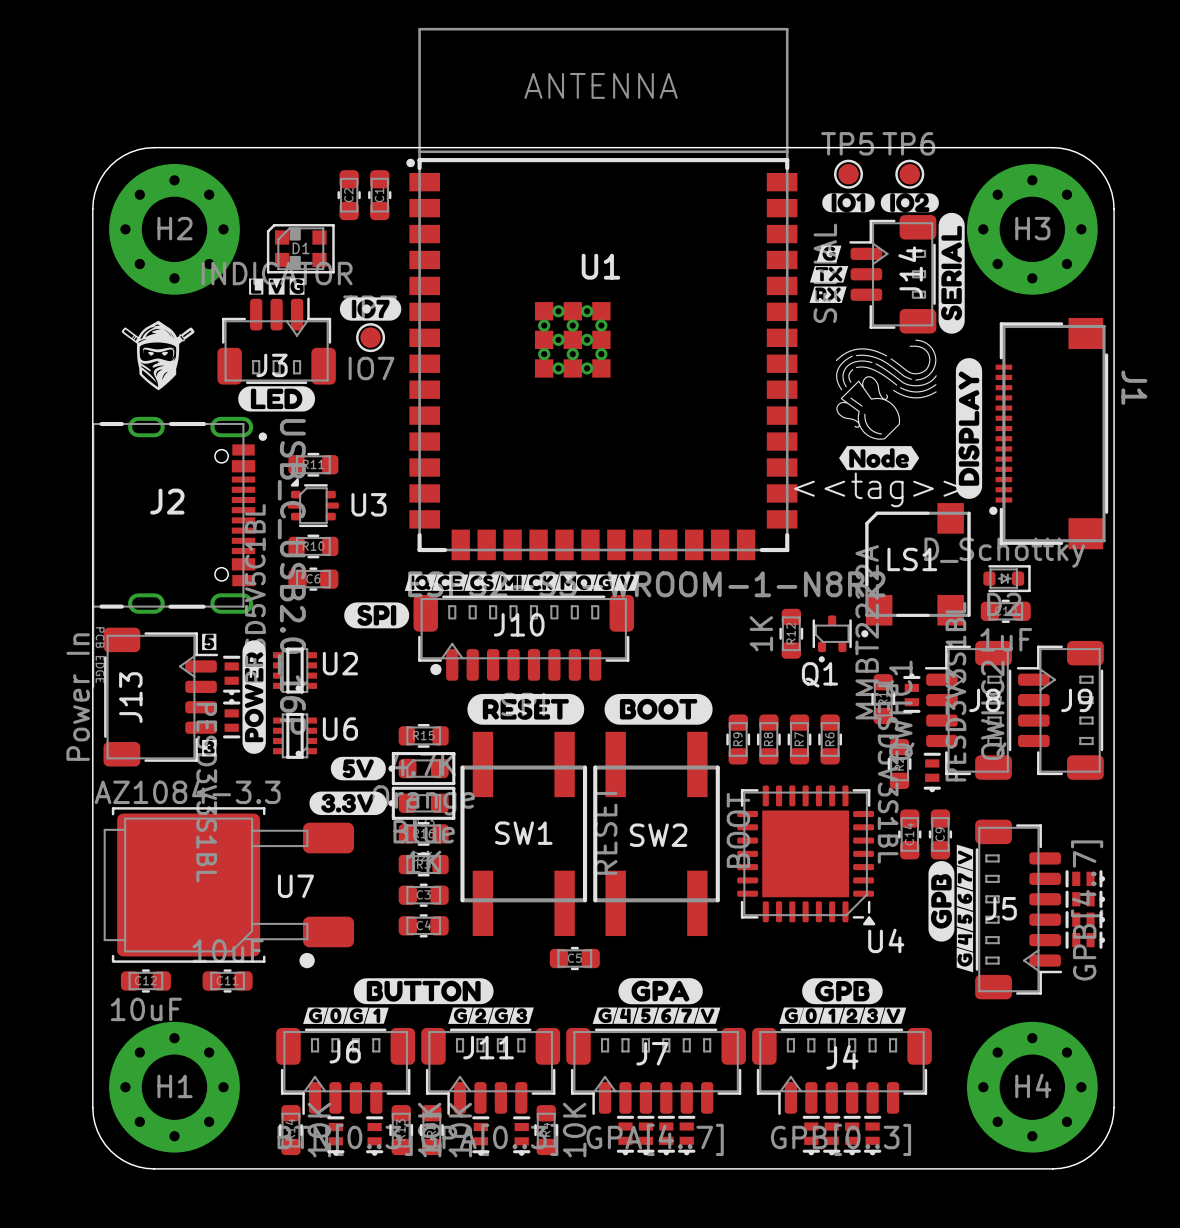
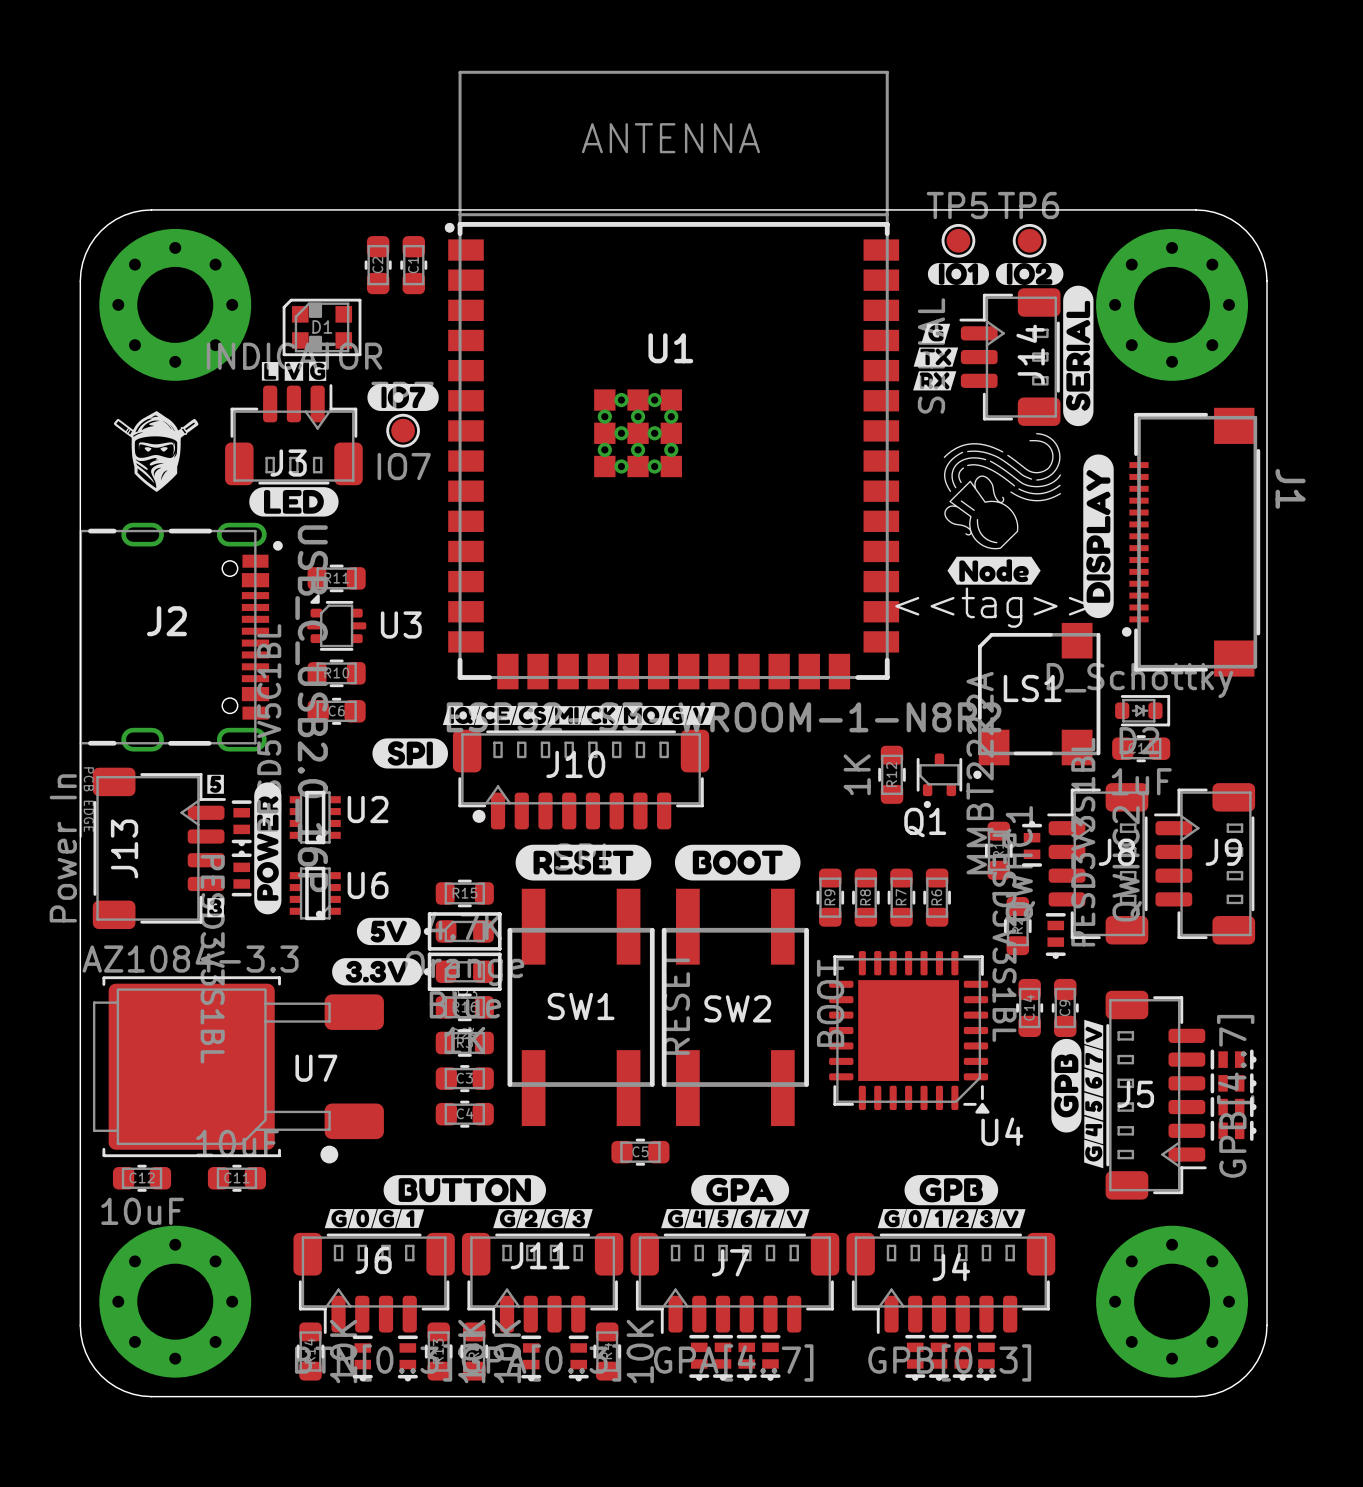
H2 name: H2 (174, 228) -> none
H3 name: H3 (1032, 228) -> none
H4 name: H4 (1033, 1085) -> none
H1 name: H1 (174, 1086) -> none

